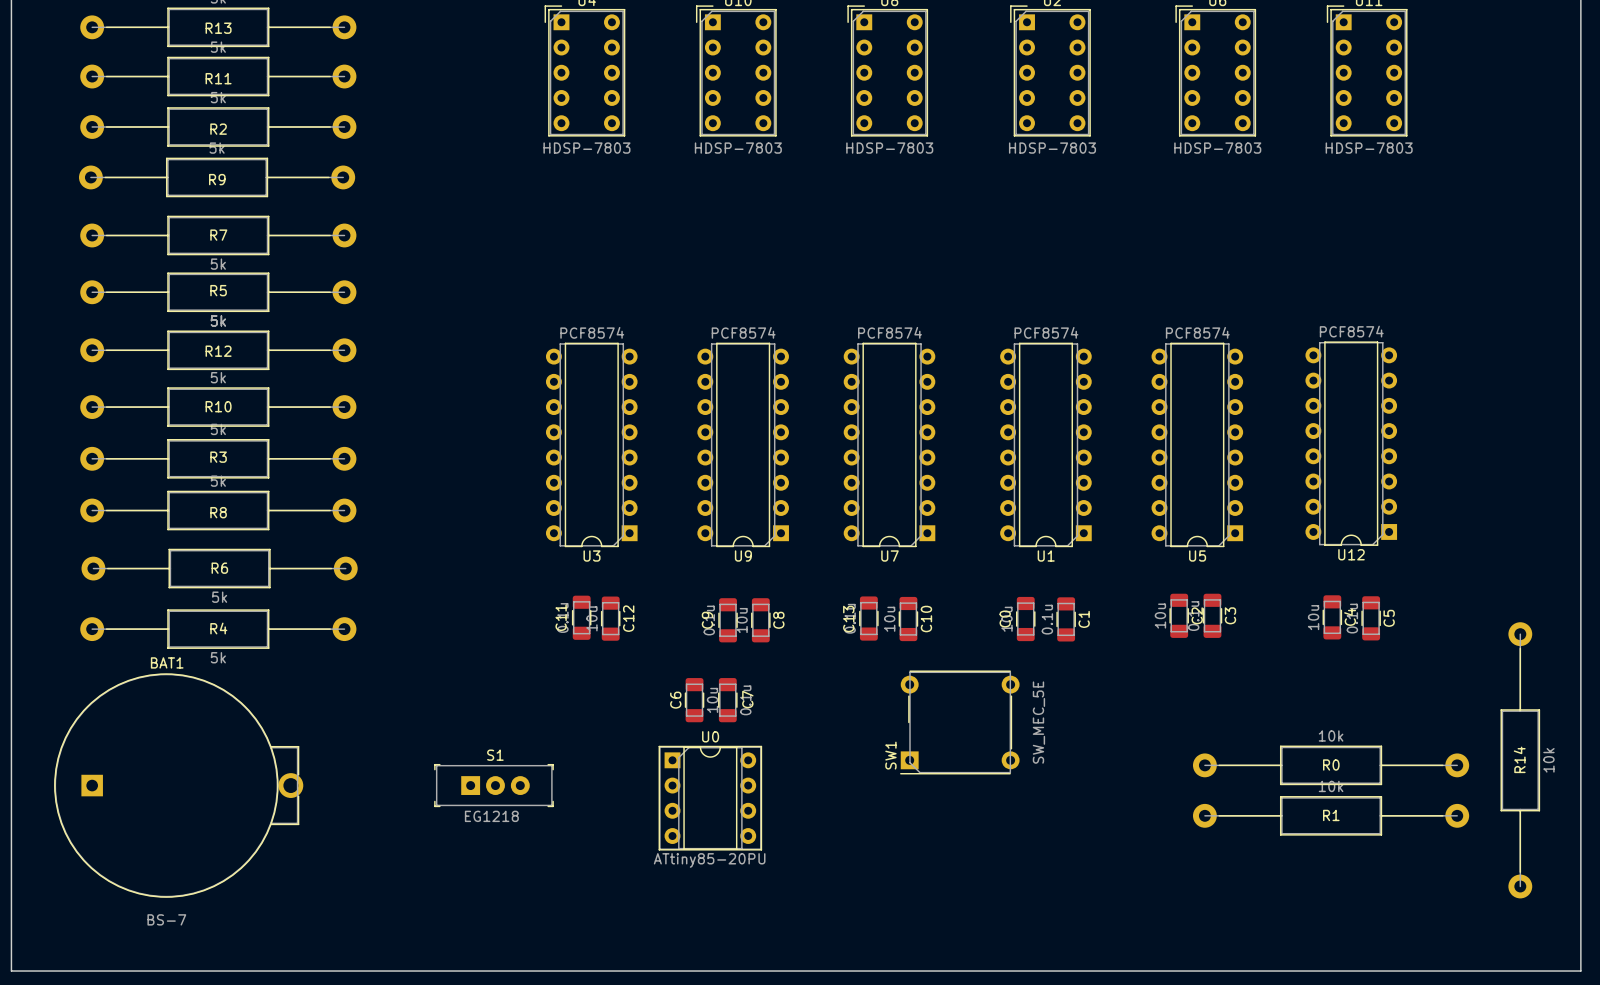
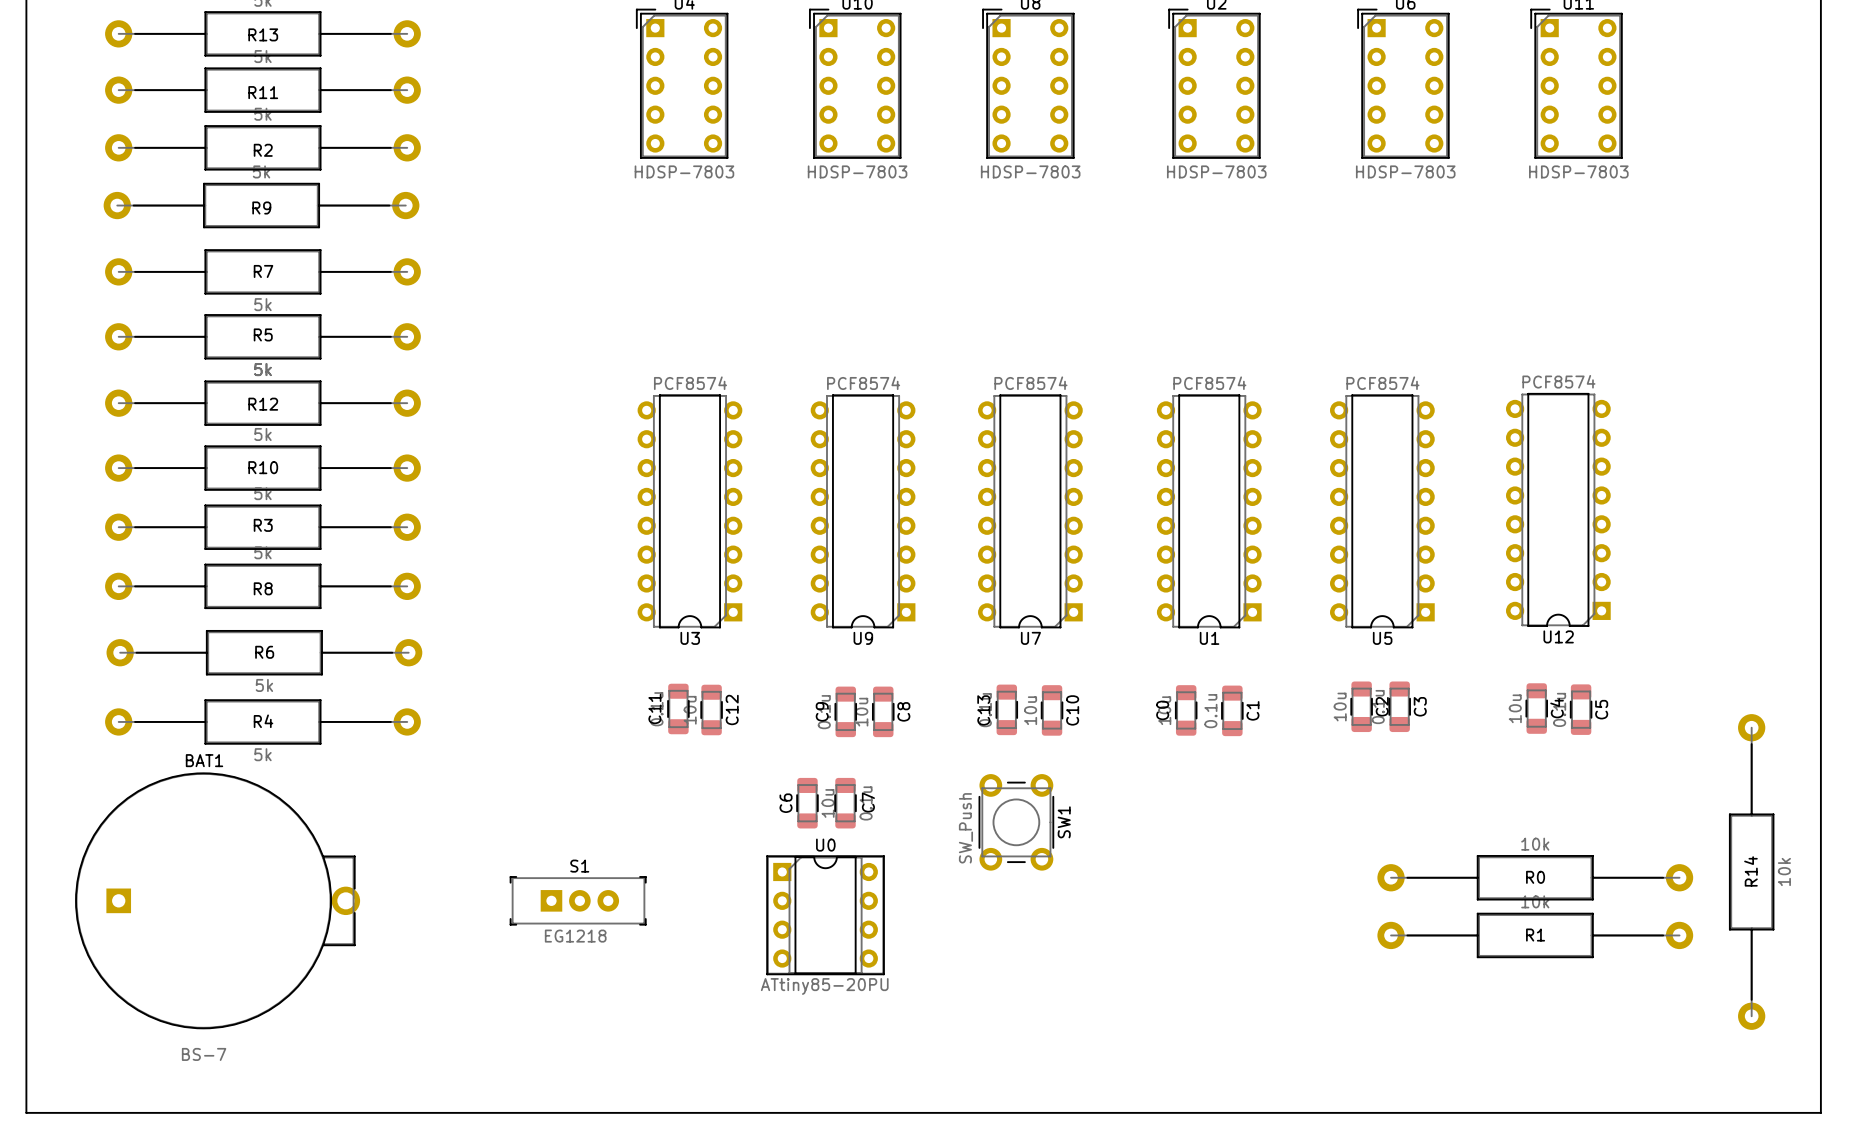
SW1 footprint: [900, 670, 1020, 775] -> [978, 774, 1054, 871]
SW1 value: SW_MEC_5E (1038, 722) -> SW_Push (965, 828)
SW1 name position: SW1 (890, 755) -> SW1 (1064, 822)

